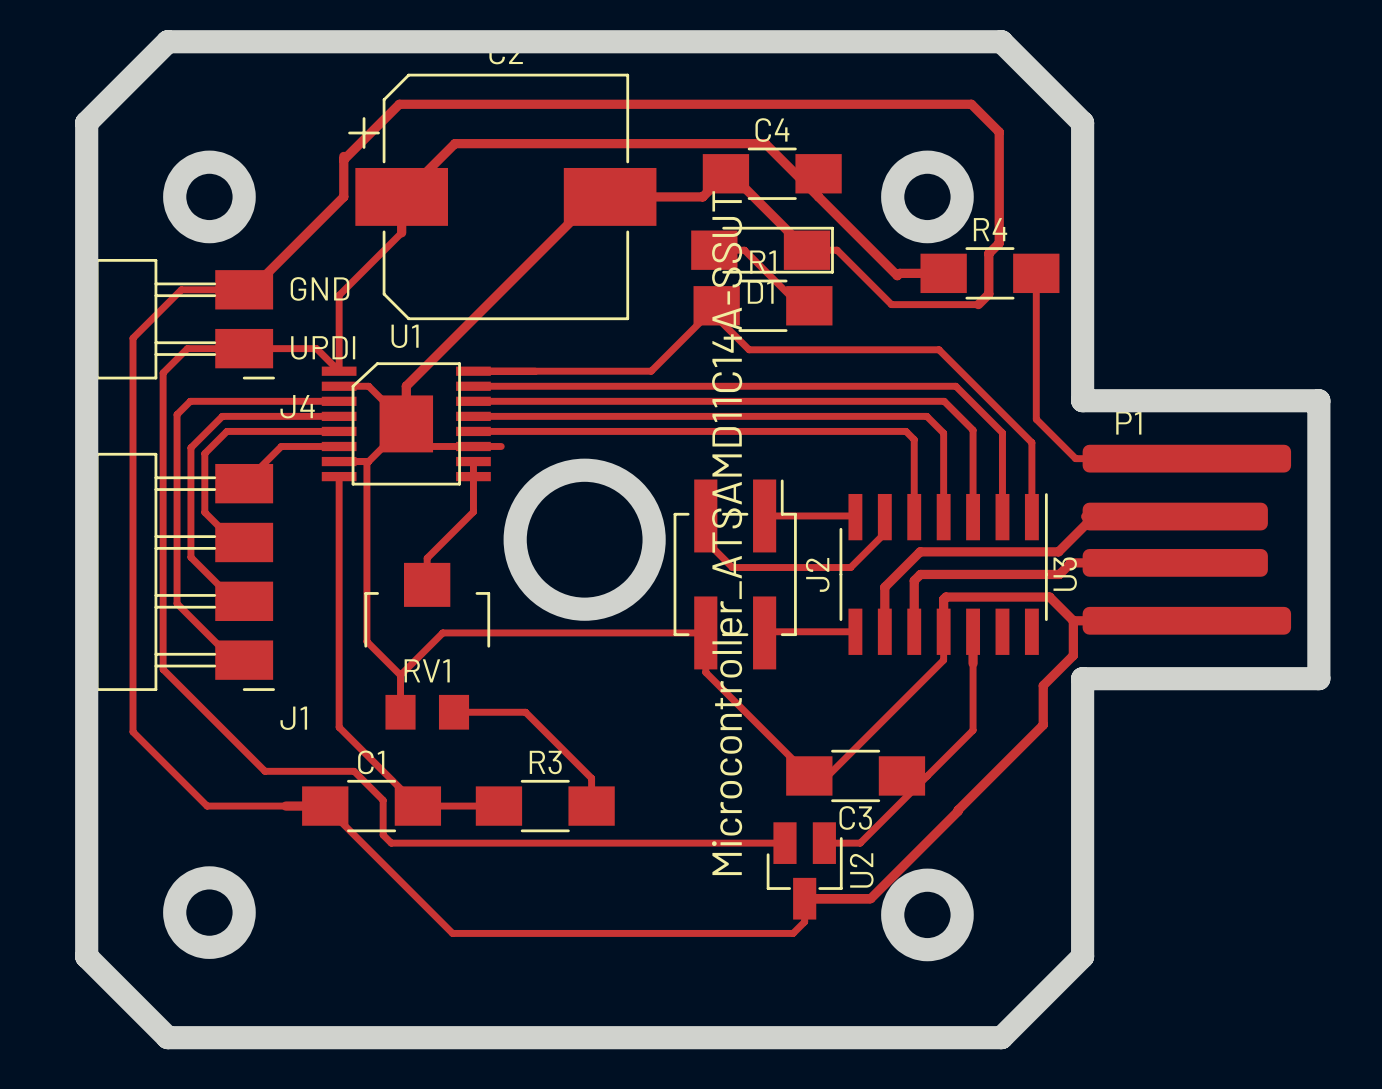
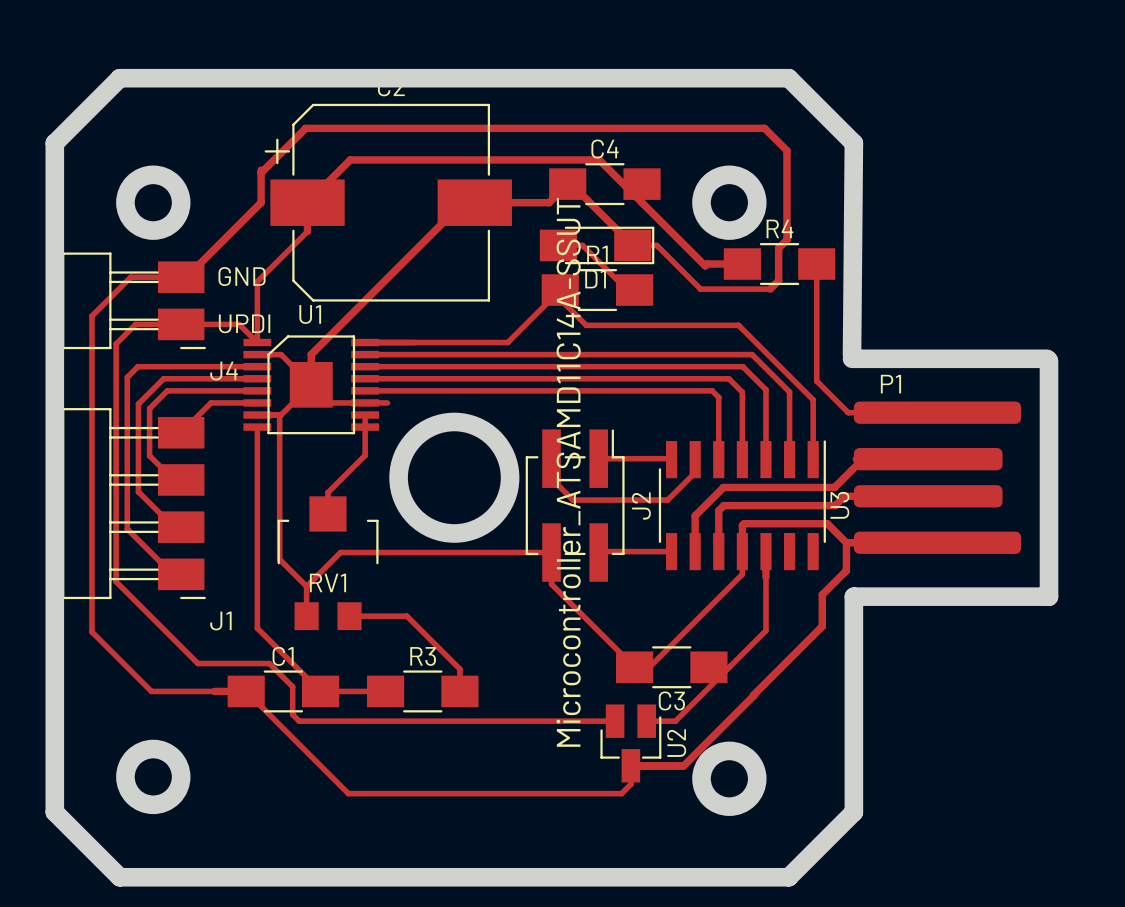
board edge: (1082, 122) (1082, 400) (1318, 400) (1318, 678) (1082, 678) (1082, 687) -> (853, 143) (852, 355)
board edge: none -> (852, 358) (1047, 358)
board edge: none -> (1049, 360) (1049, 596) (853, 596)

